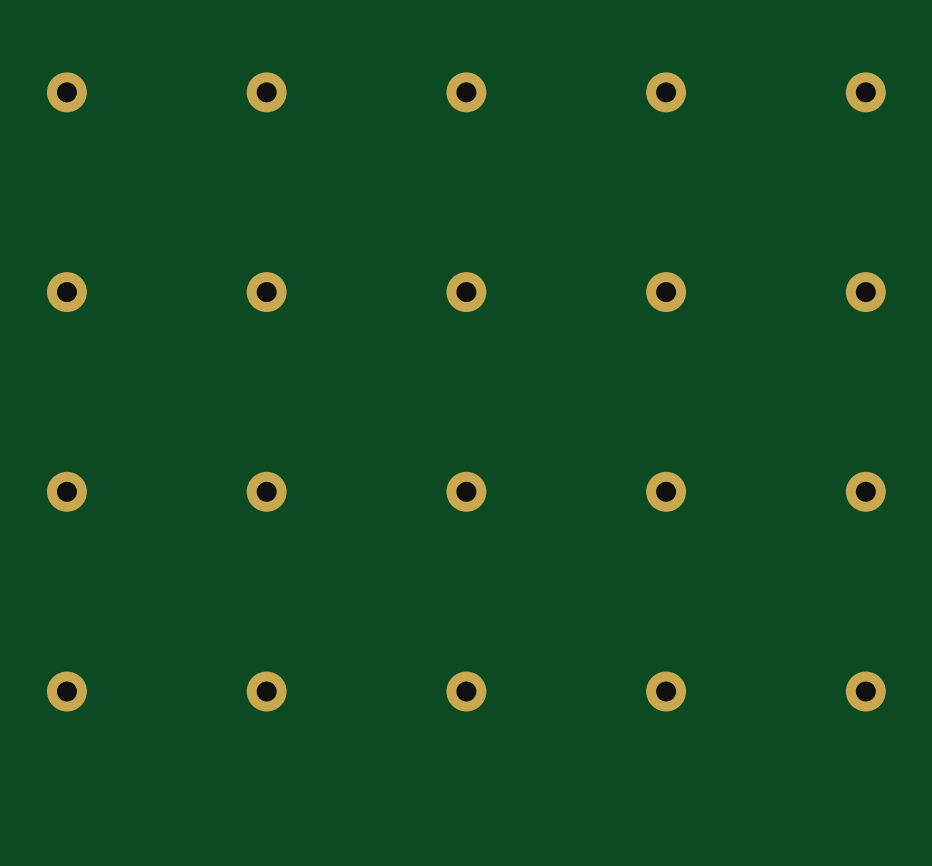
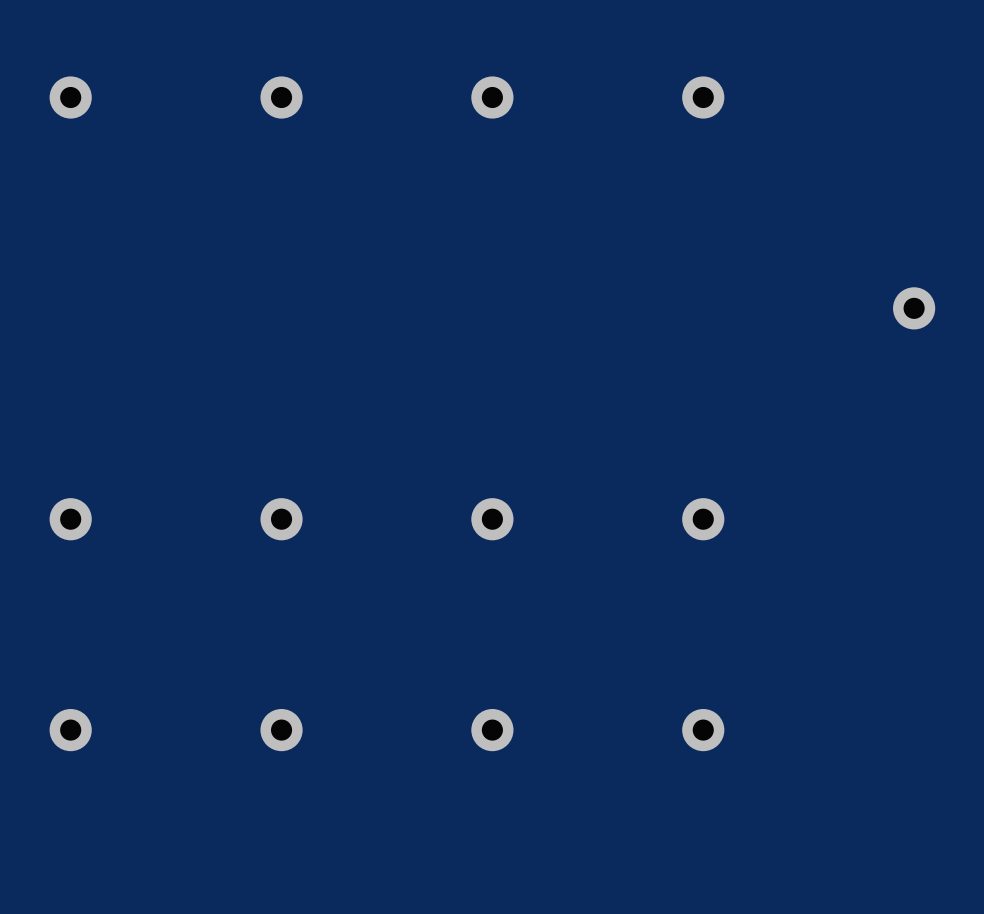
via: (865, 92) -> none
via: (66, 292) -> none
via: (266, 292) -> none
via: (466, 292) -> none
via: (666, 292) -> none
via: (865, 491) -> none
via: (865, 691) -> none

